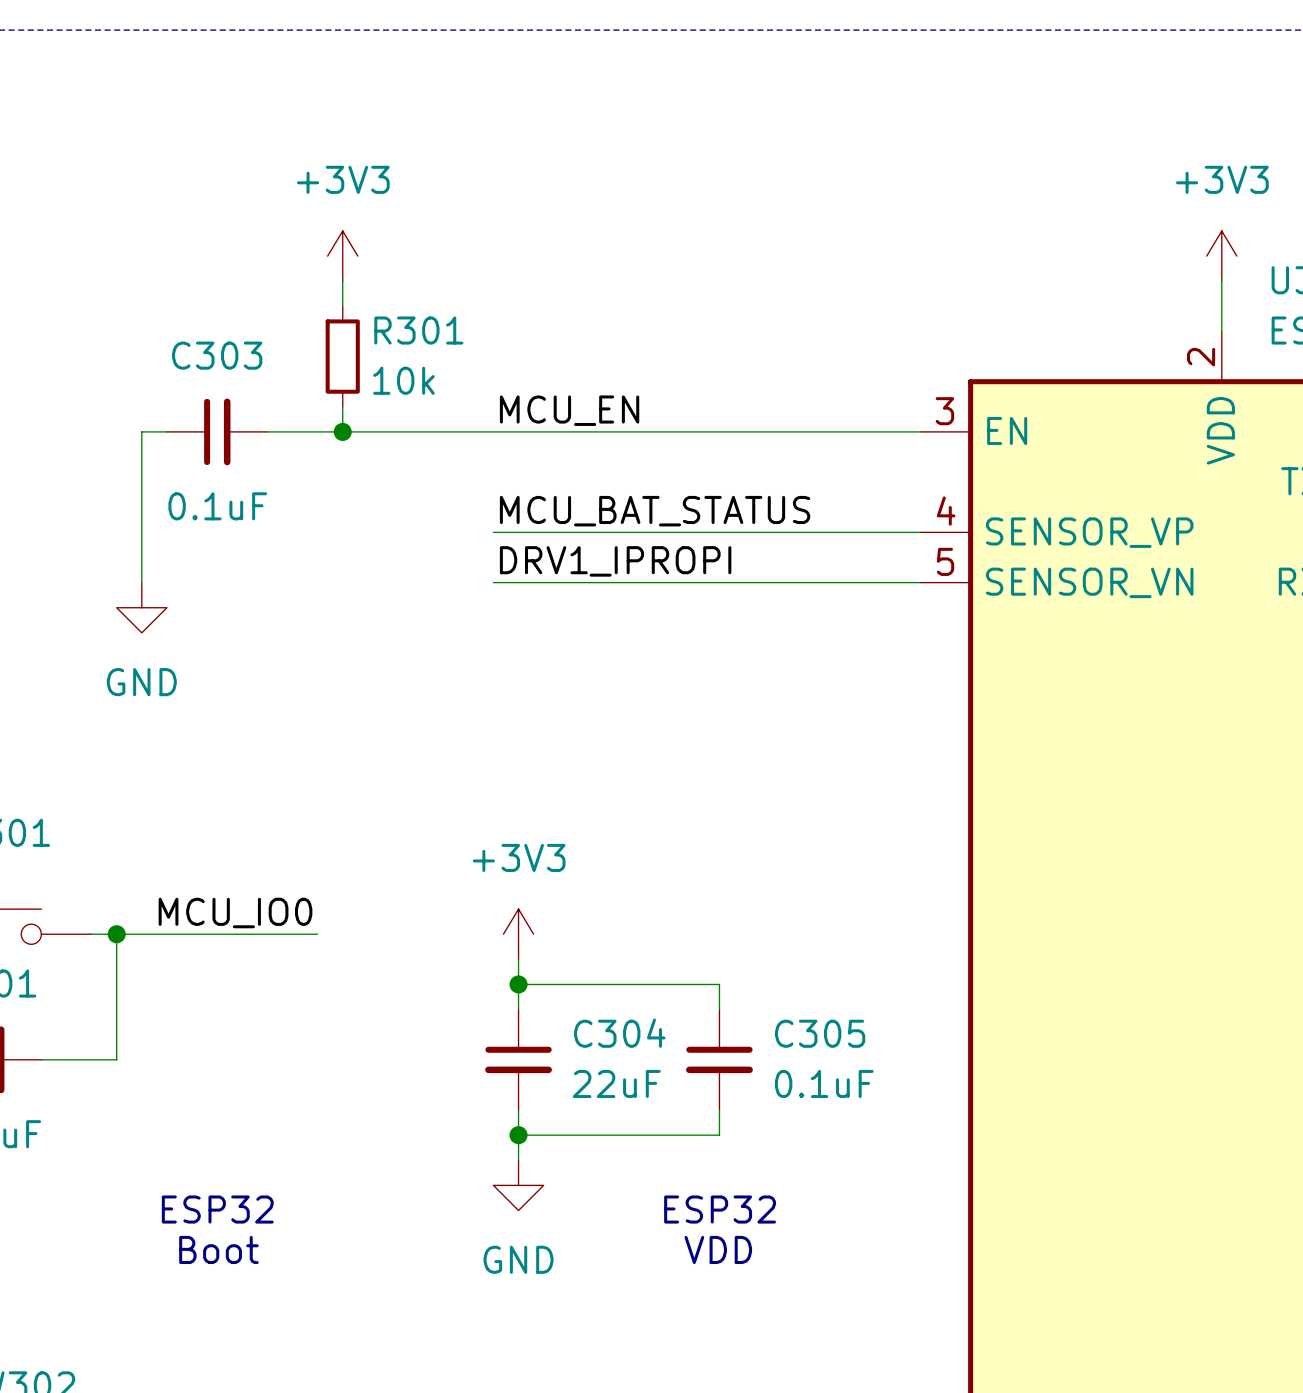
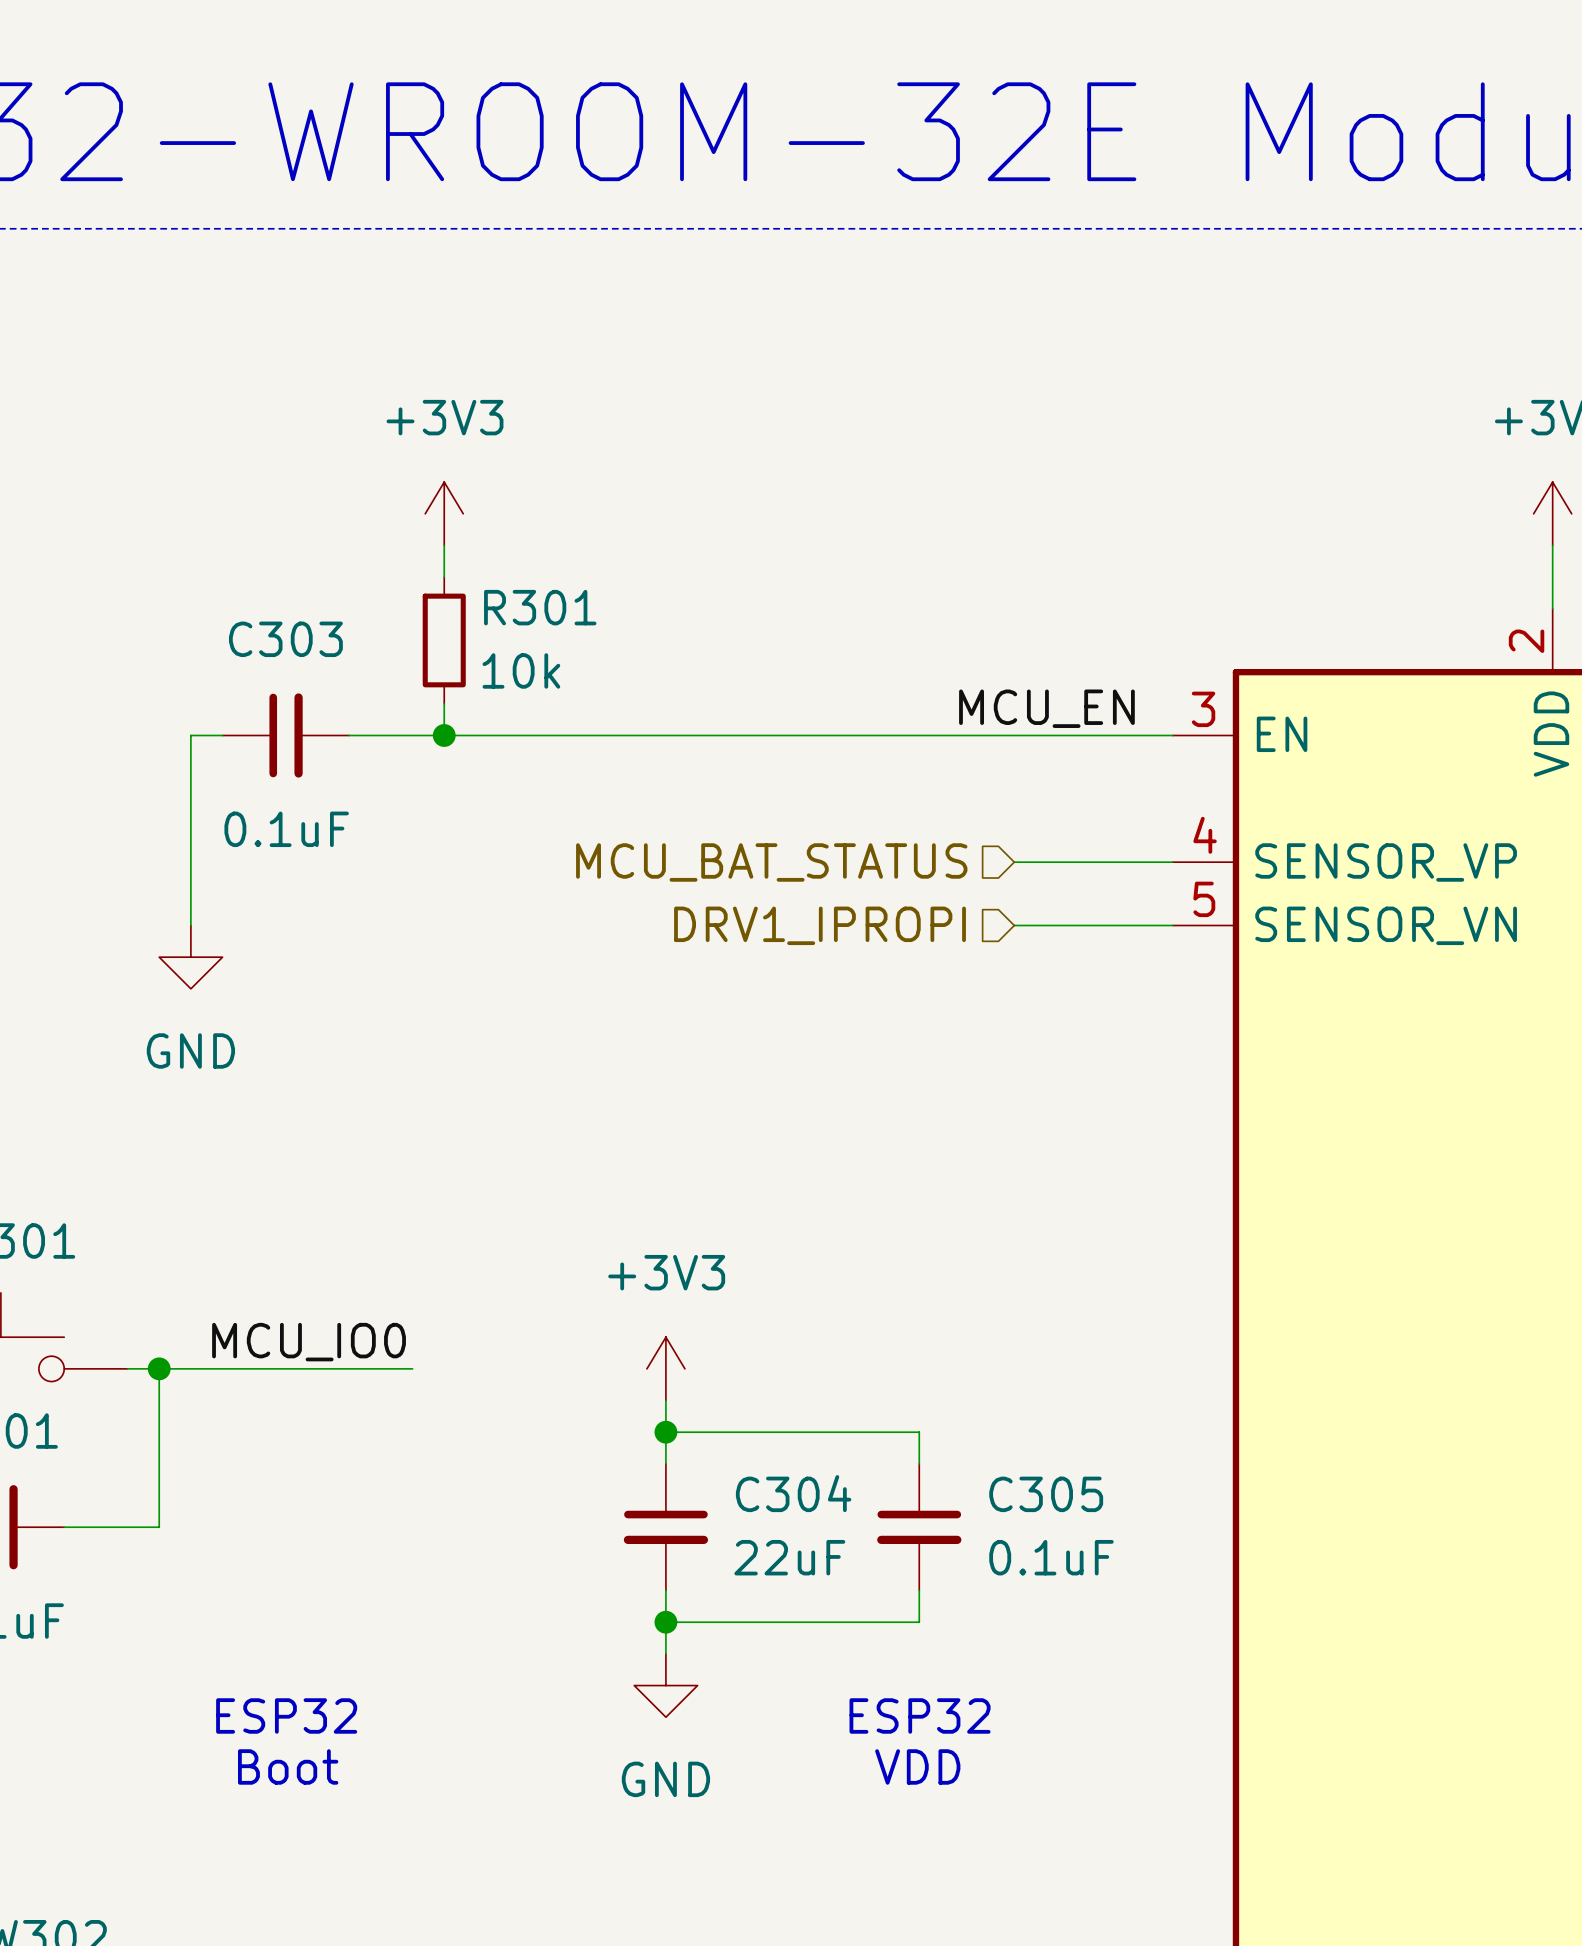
label position: MCU_EN (569, 410) -> MCU_EN (1046, 708)
label: MCU_BAT_STATUS (655, 511) -> none
wire: (493, 532) (794, 532) -> none
hierarchical label: none -> MCU_BAT_STATUS (771, 862)
label: DRV1_IPROPI (615, 561) -> none
wire: (493, 582) (794, 582) -> none
hierarchical label: none -> DRV1_IPROPI (820, 925)

